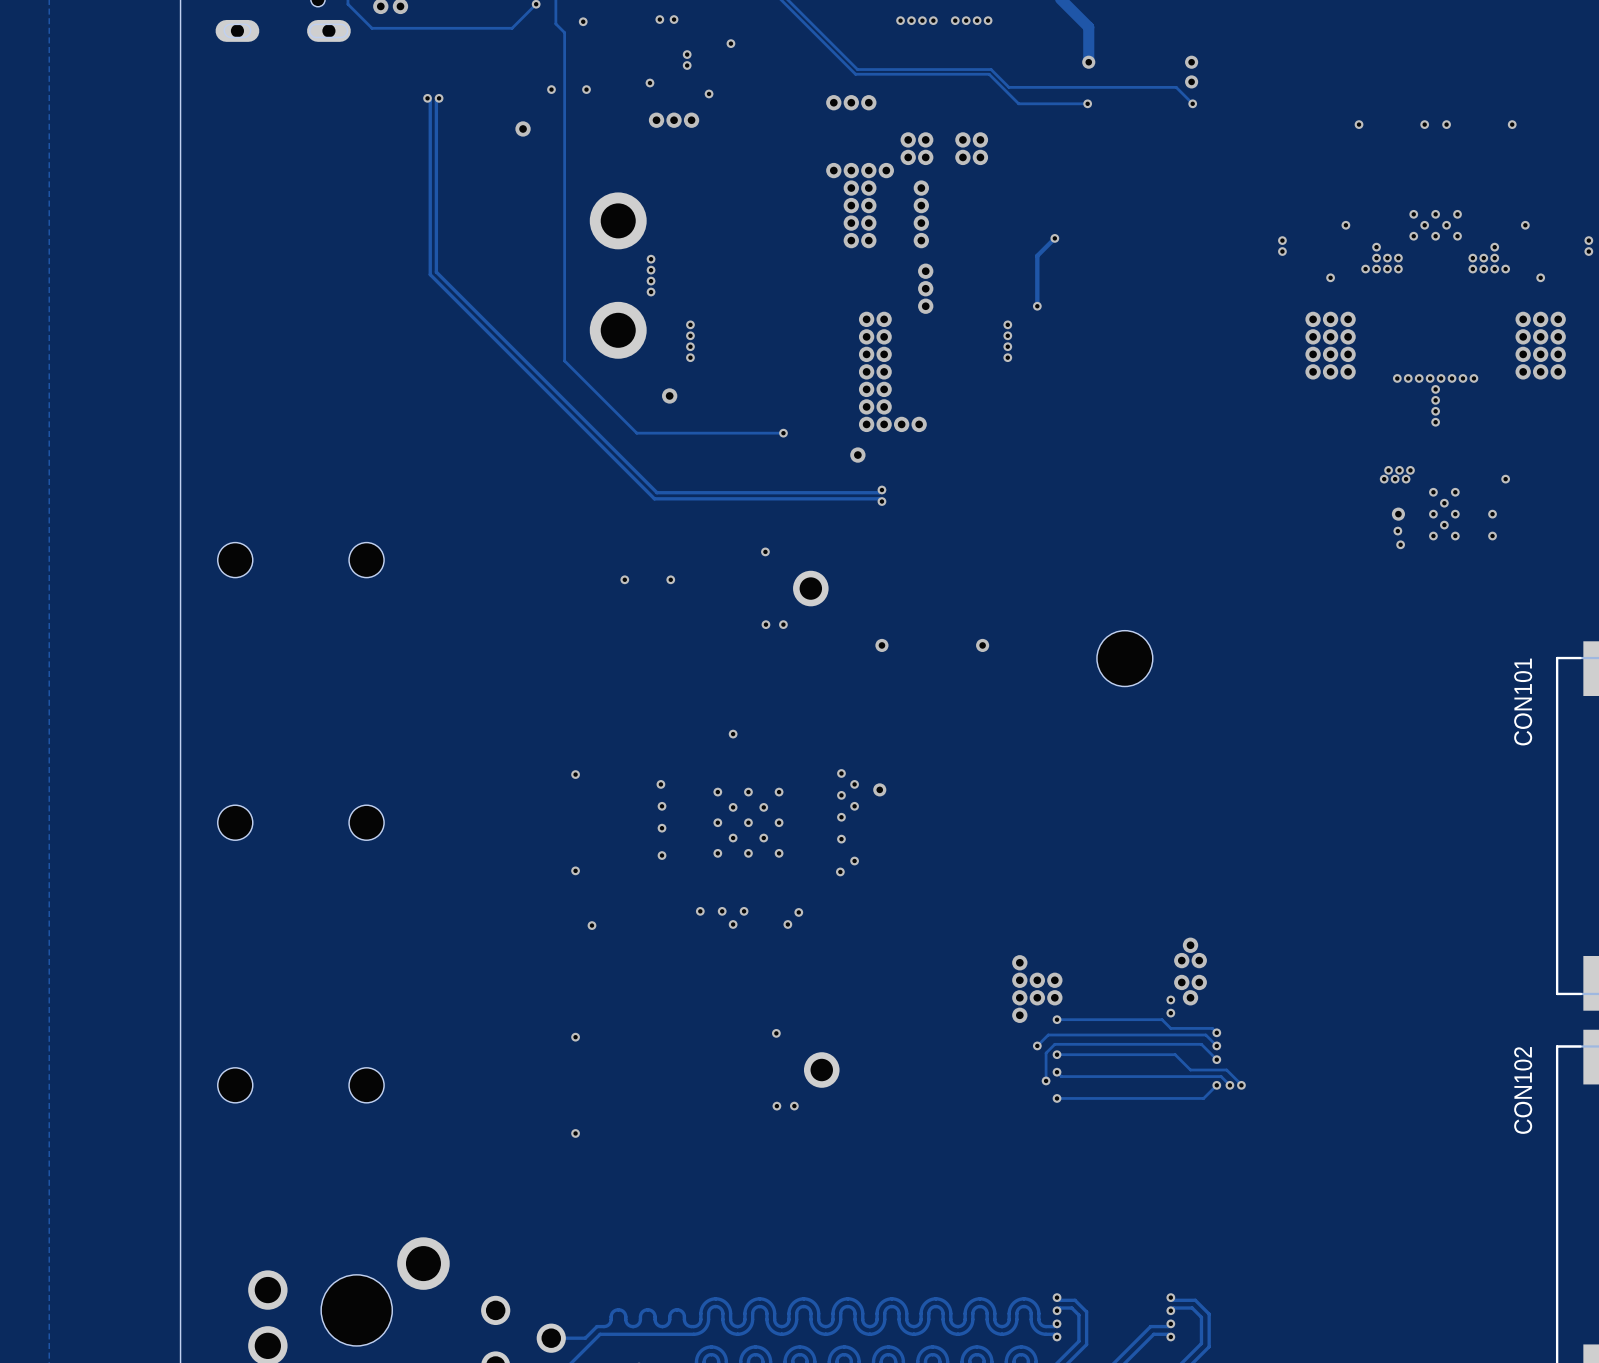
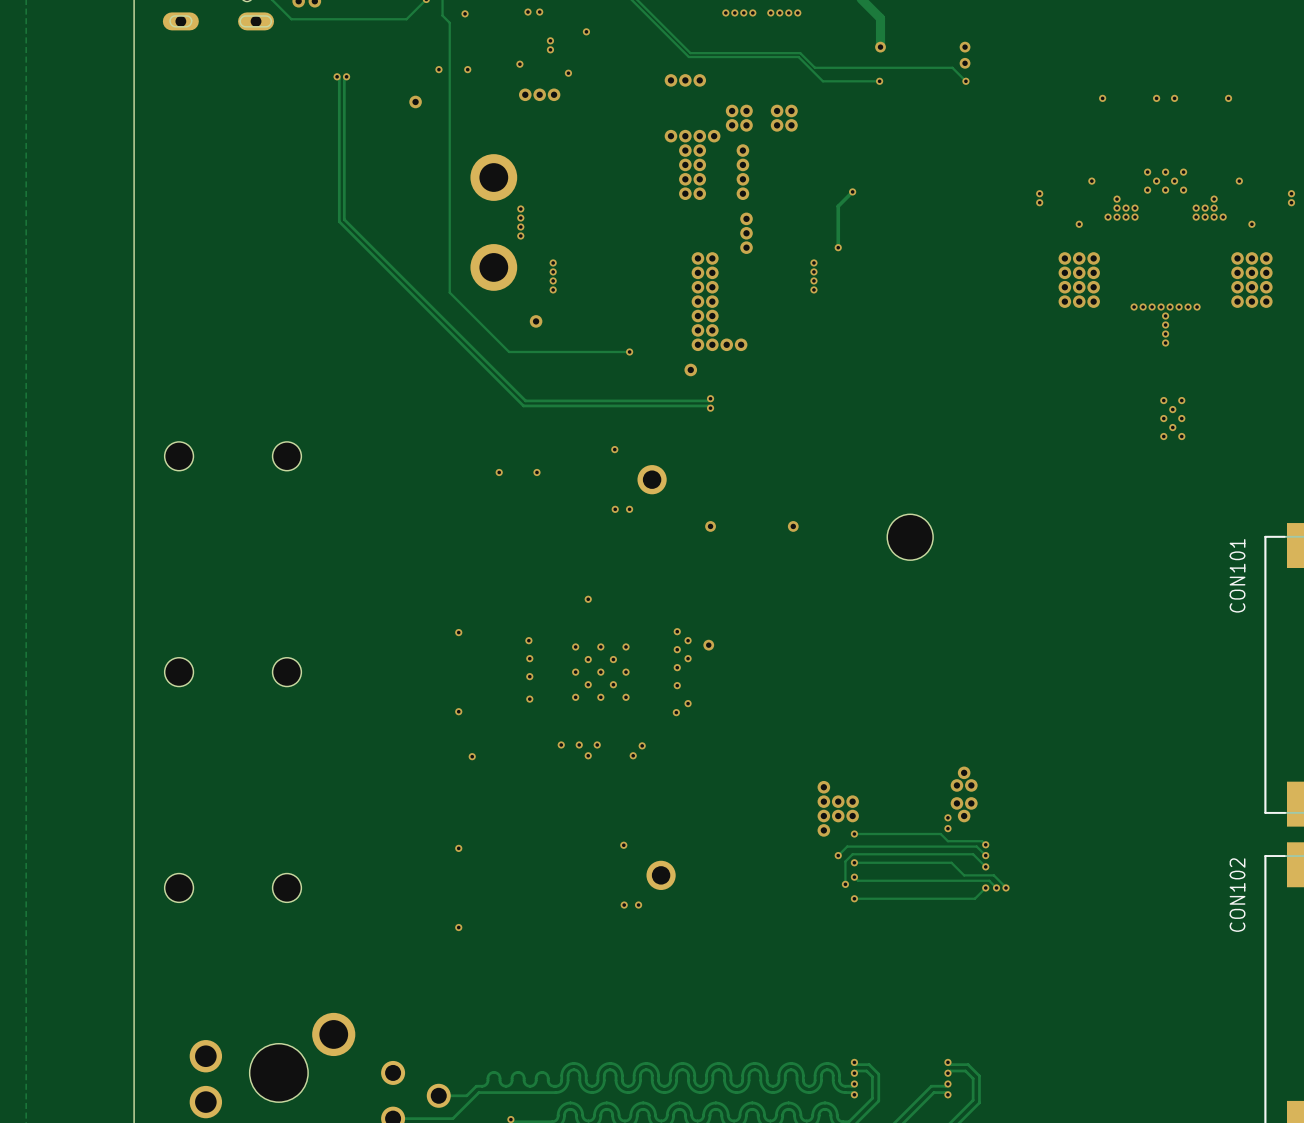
via: (1388, 470) -> none
via: (1399, 470) -> none
via: (1410, 470) -> none
via: (1384, 479) -> none
via: (1395, 479) -> none
via: (1406, 479) -> none
via: (1505, 479) -> none
via: (1398, 514) -> none
via: (1492, 514) -> none
via: (1397, 531) -> none
via: (1492, 536) -> none
via: (1400, 544) -> none

